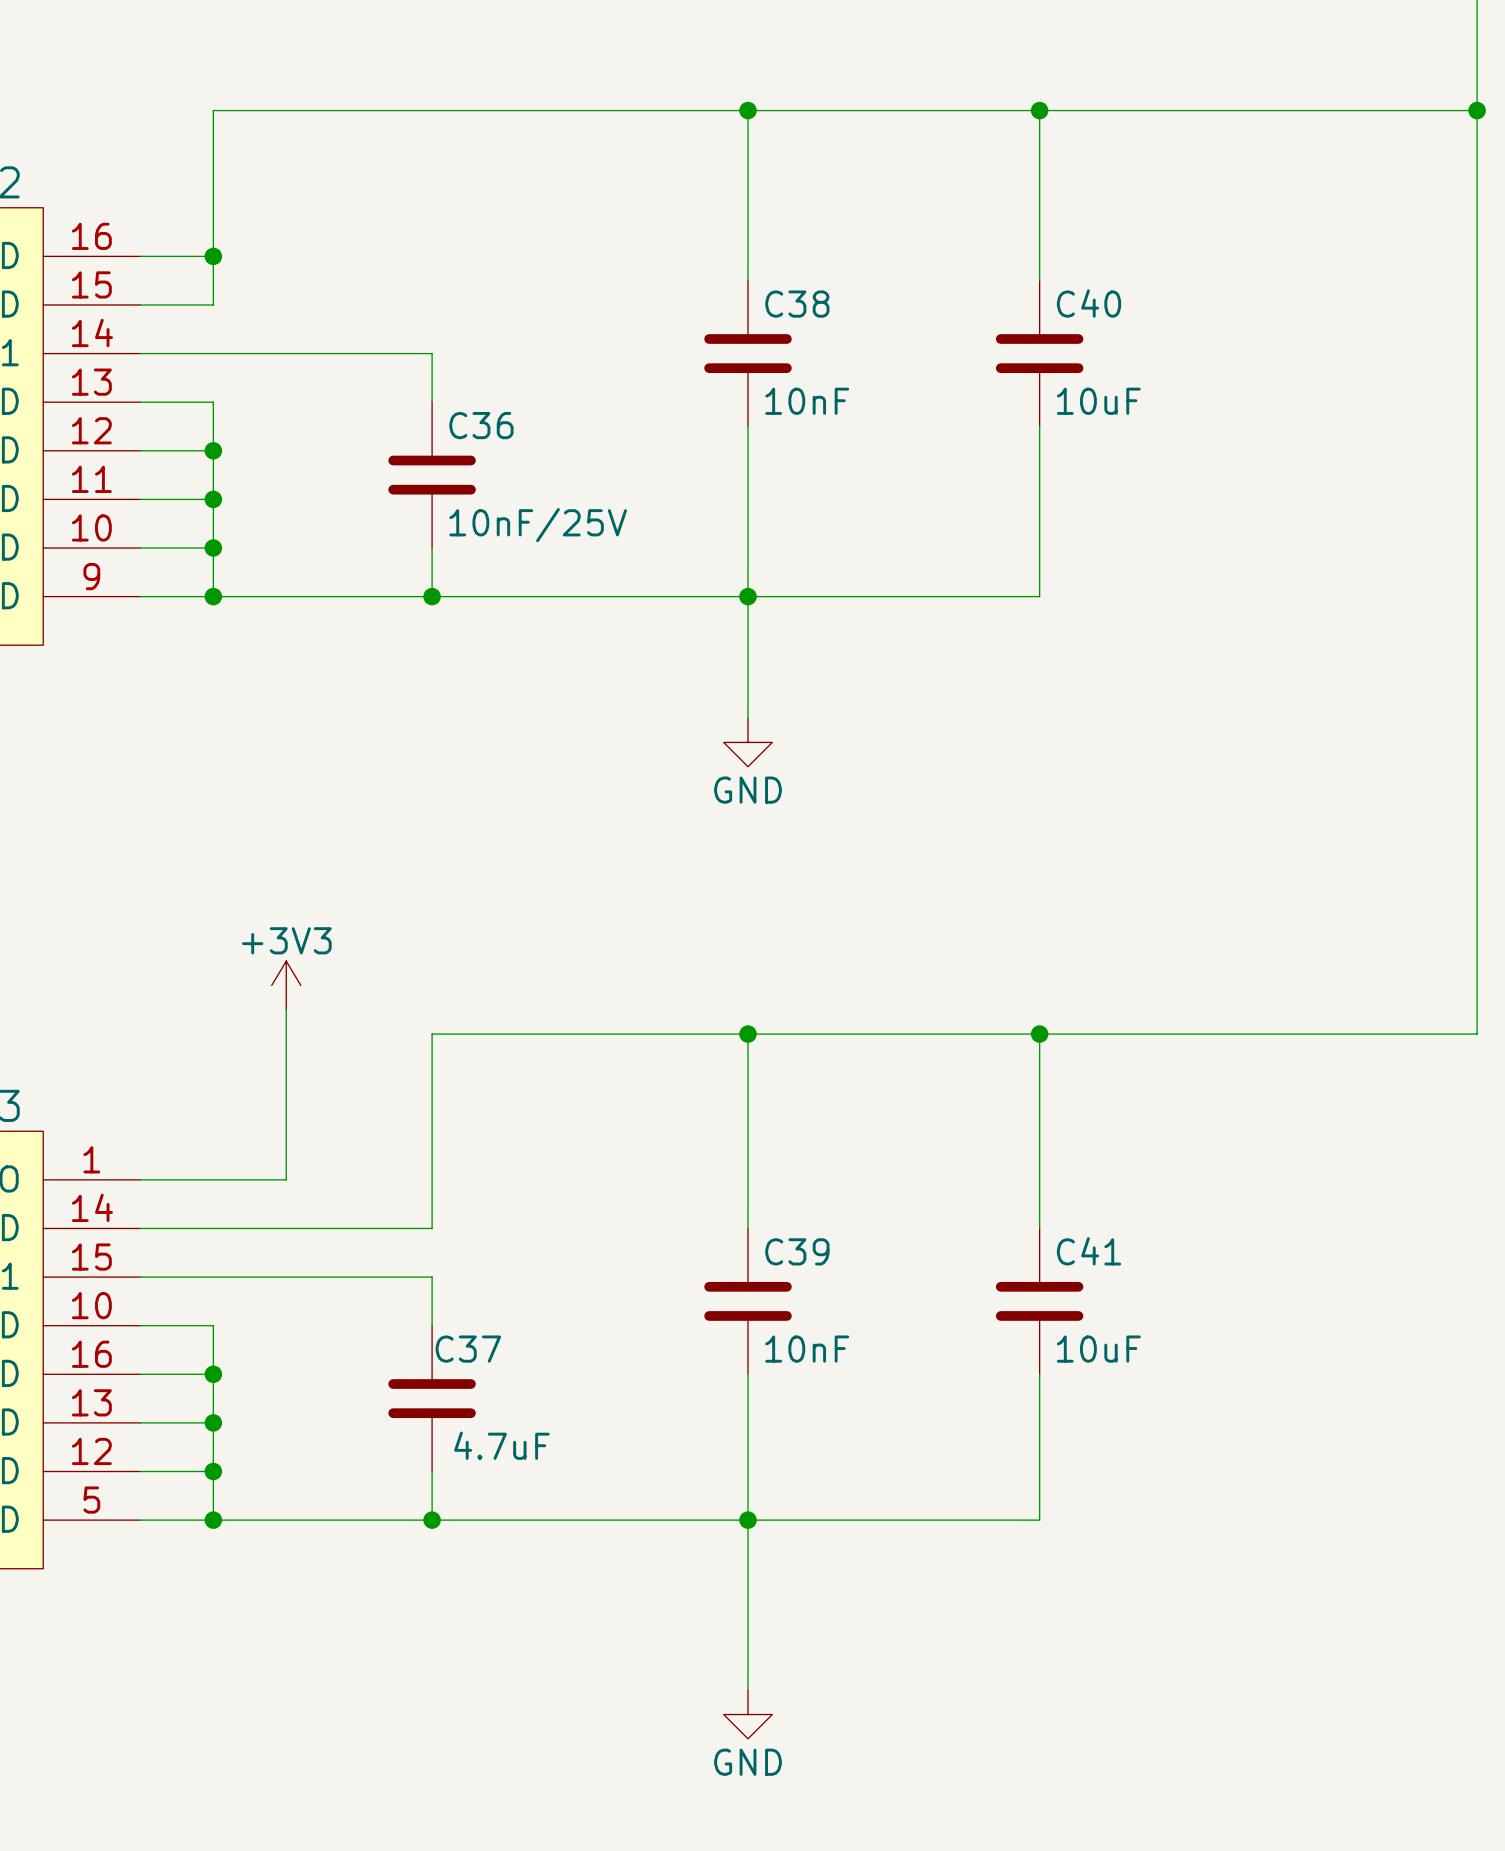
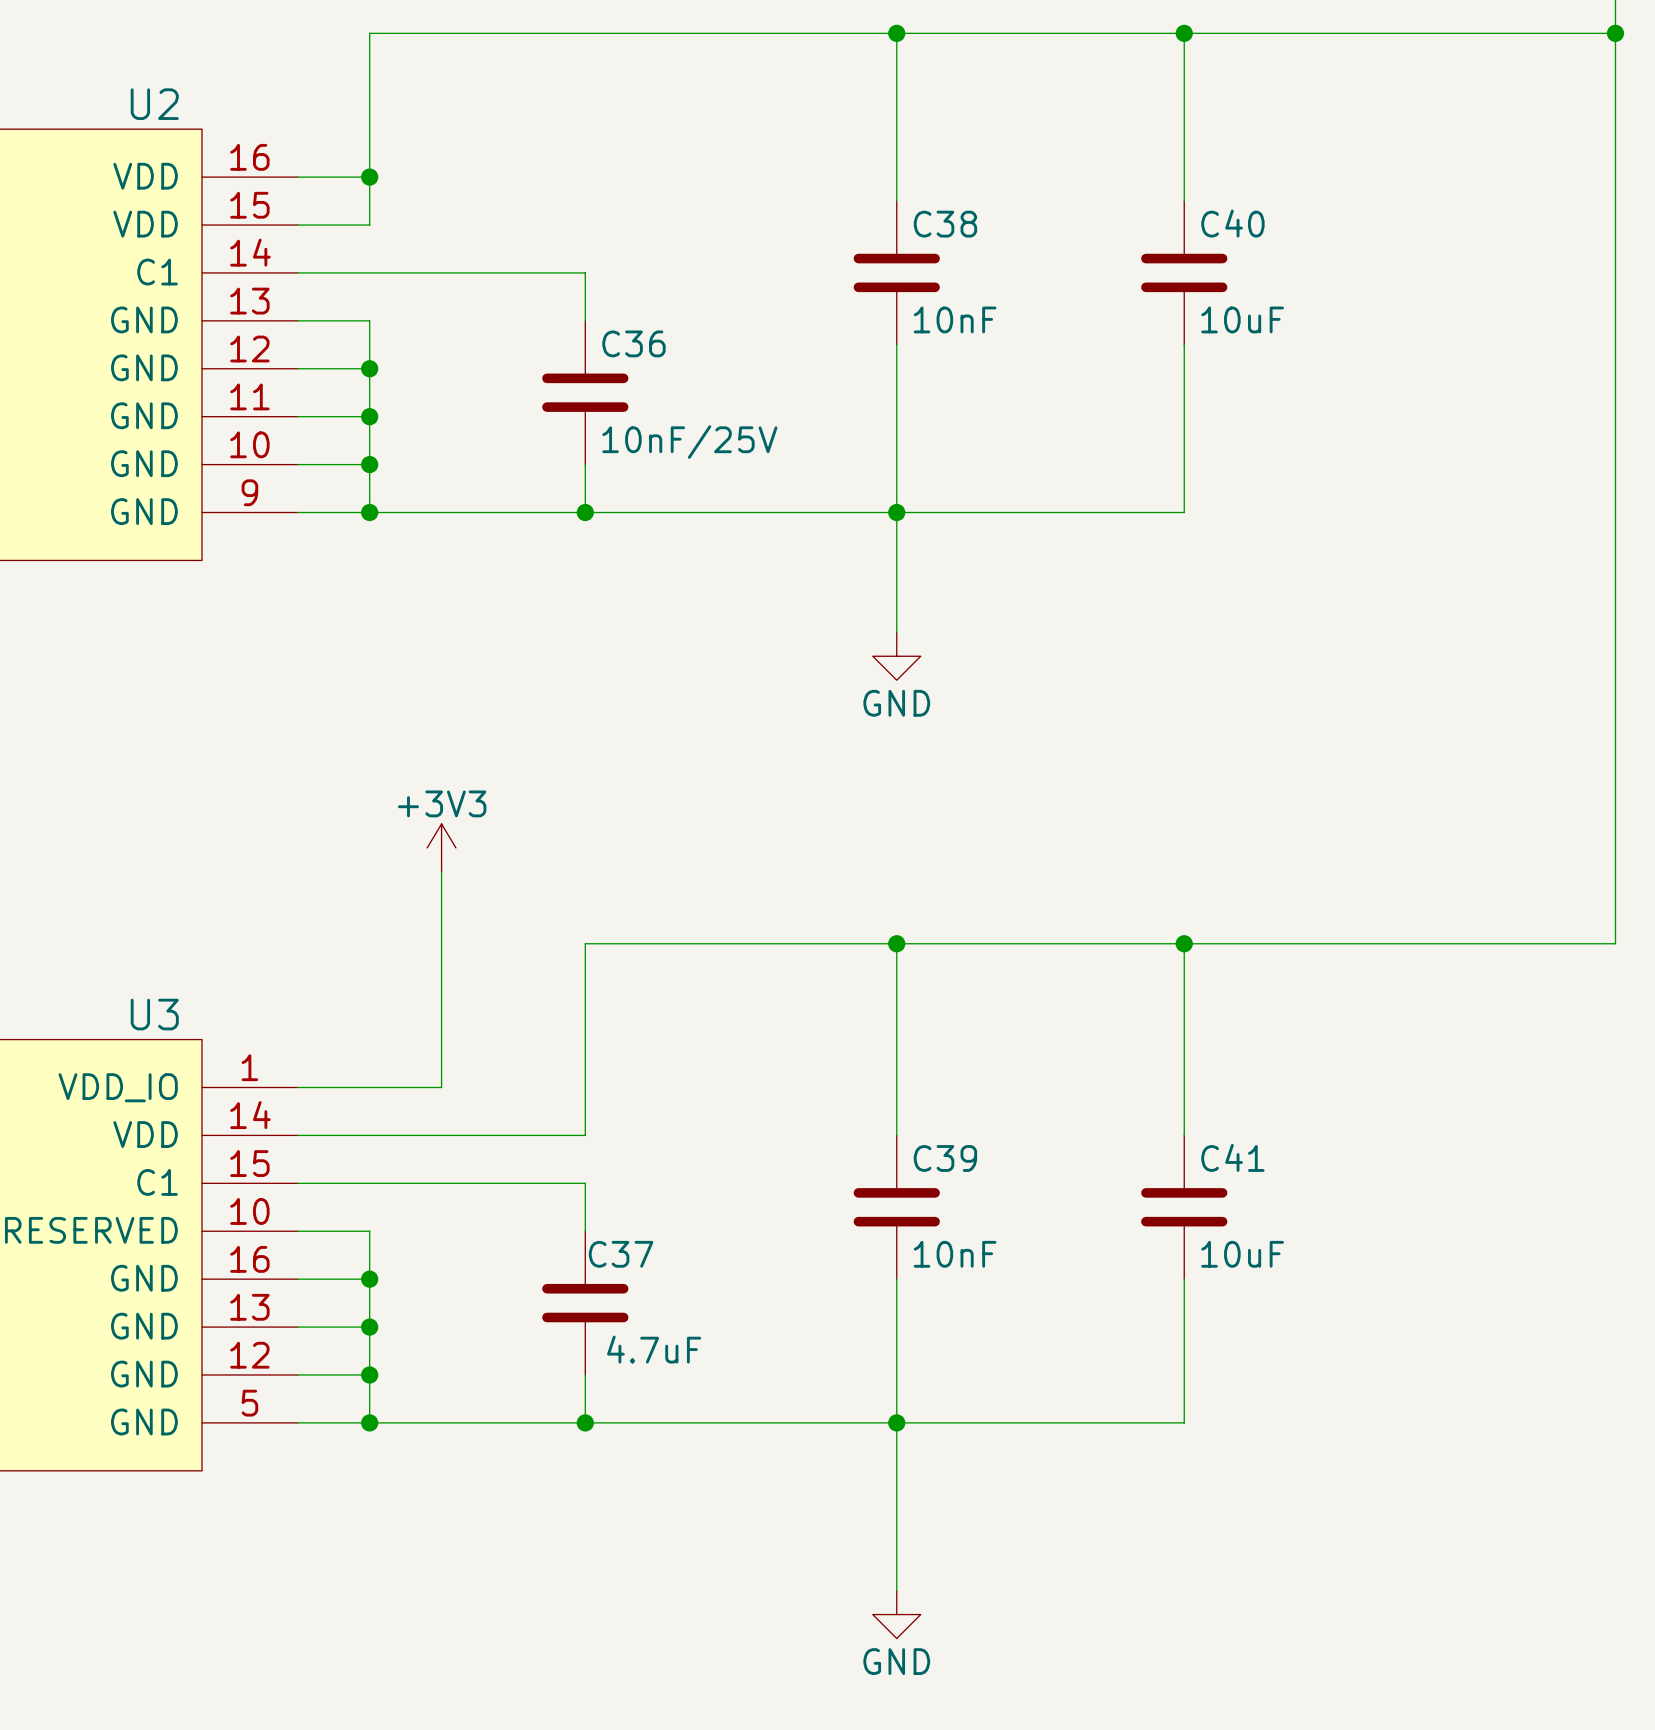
power symbol position: +3V3 (286, 985) -> +3V3 (441, 847)

